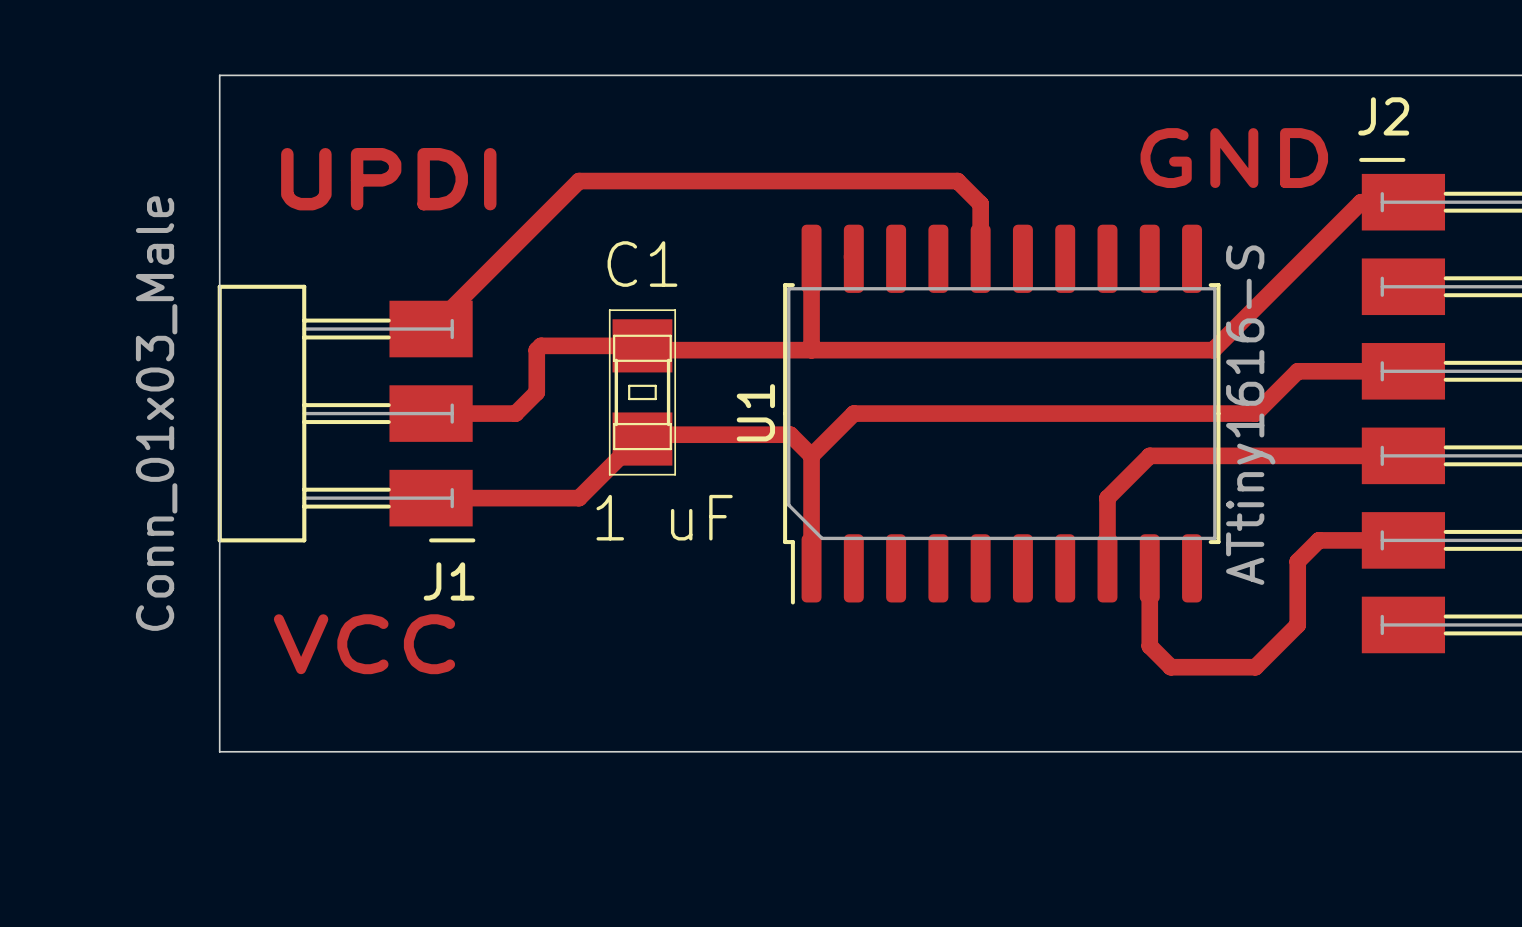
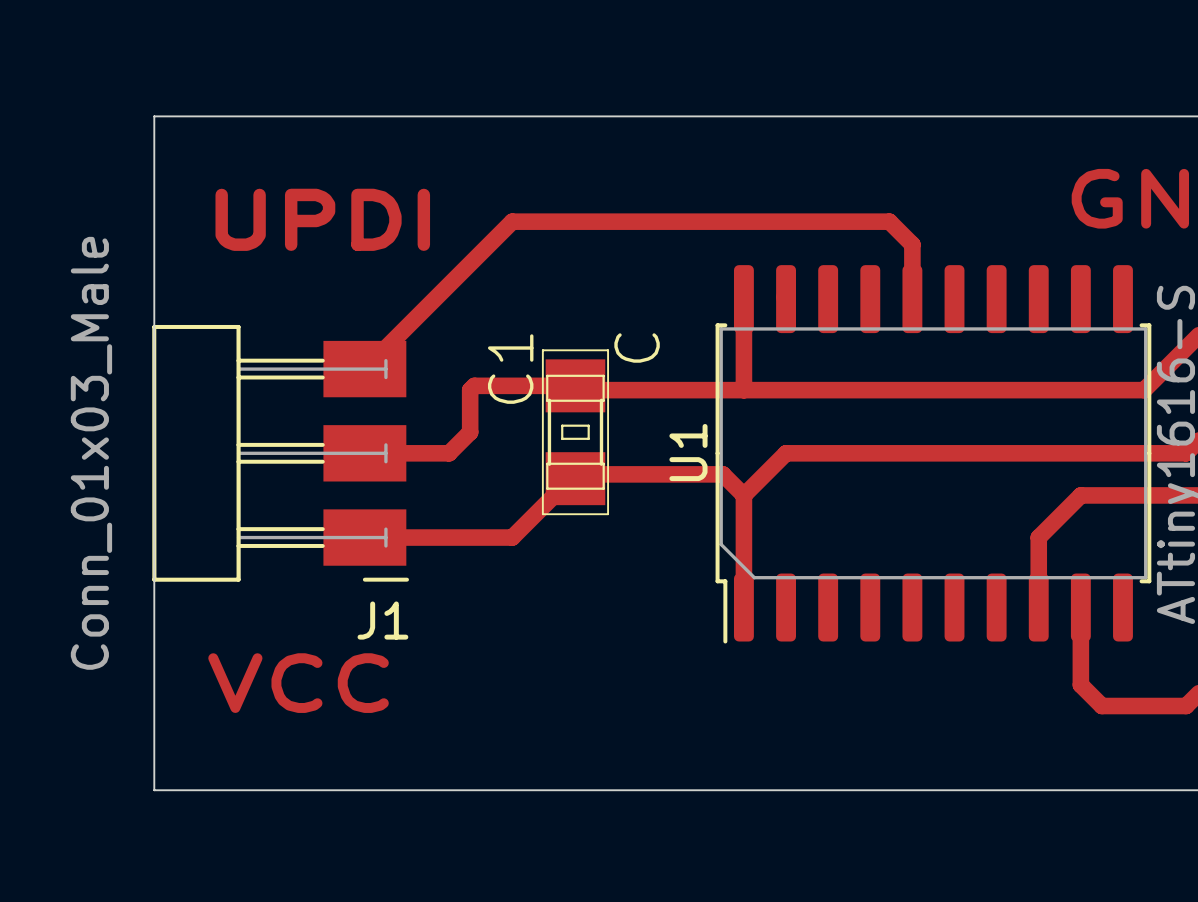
C1 name rotation: 0° (642, 264) -> 90° counterclockwise (510, 369)
C1 value: 1 uF (664, 517) -> C (637, 348)

